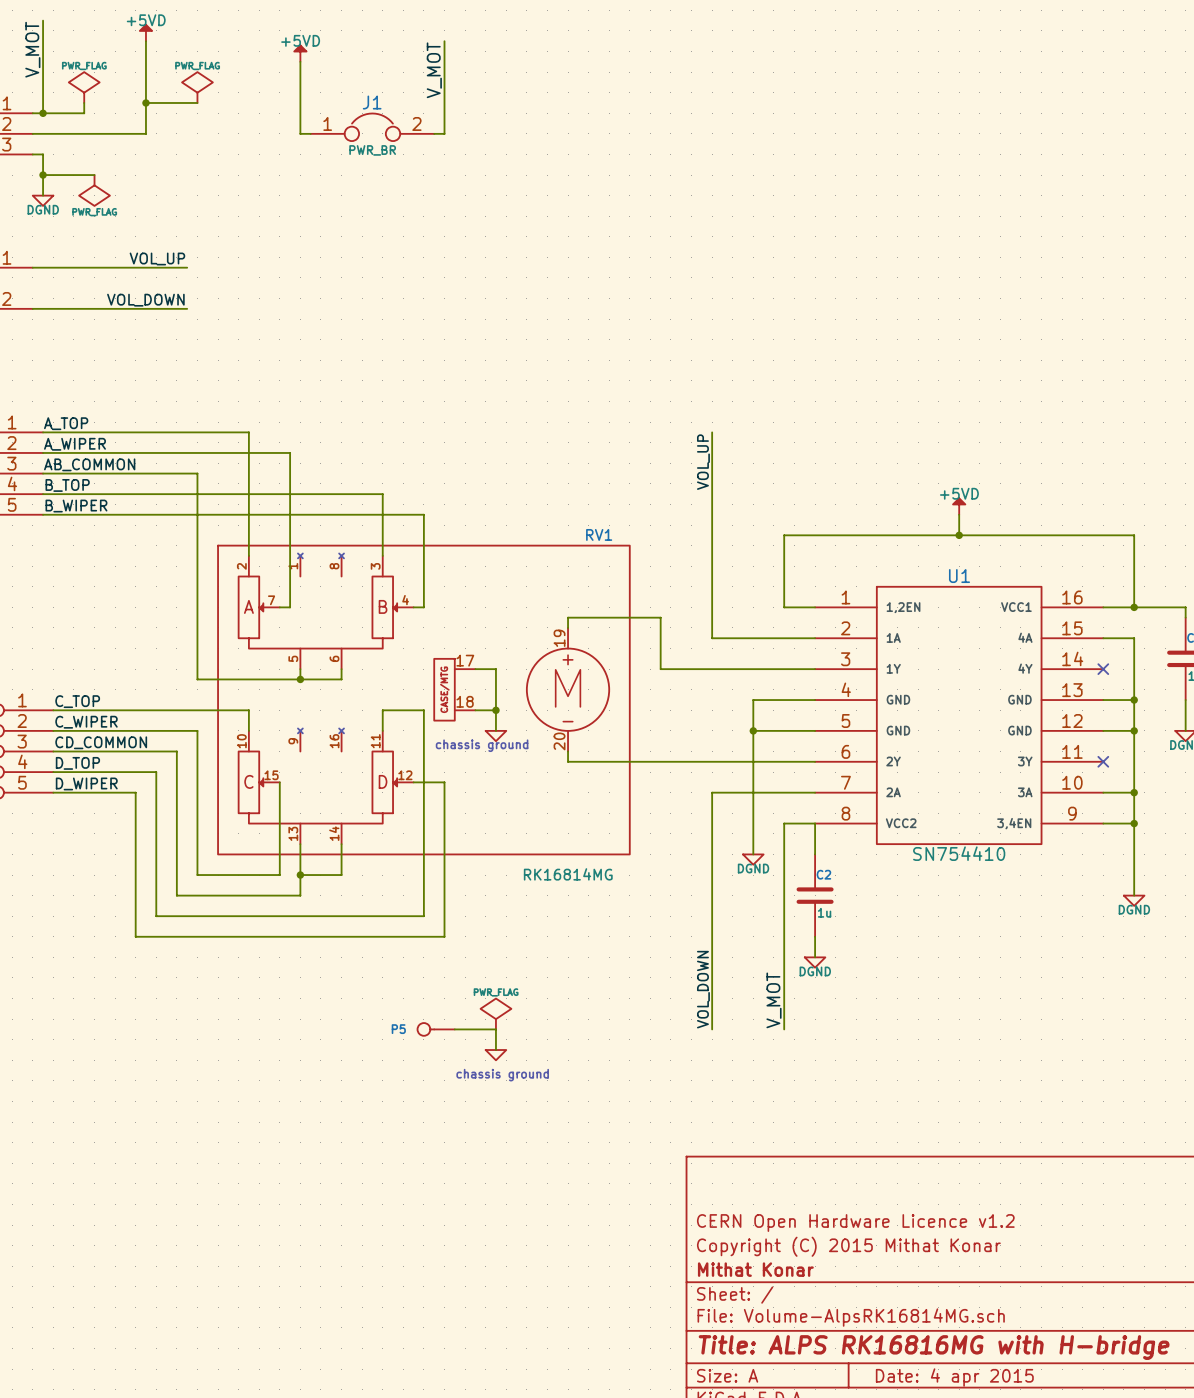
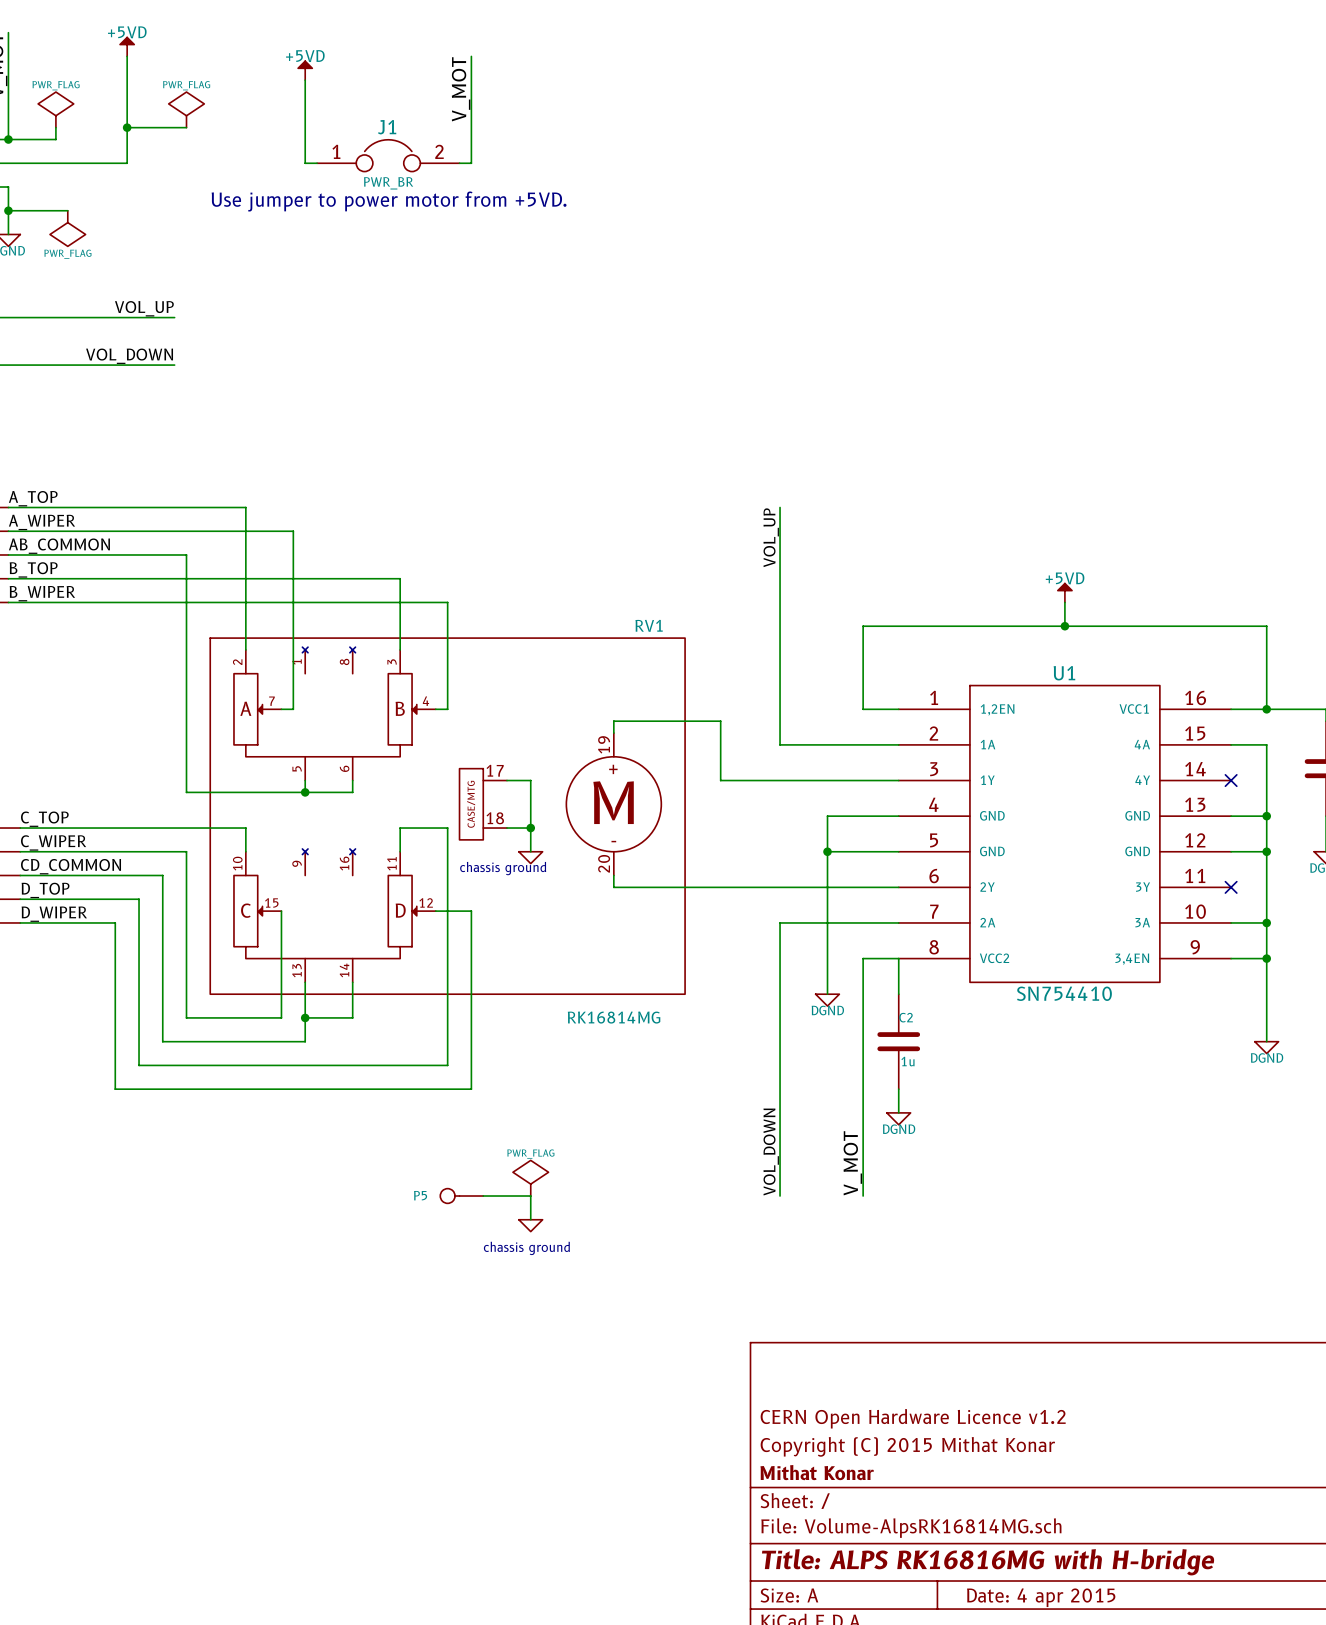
text: none -> Use jumper to power motor from +5VD. (389, 201)

